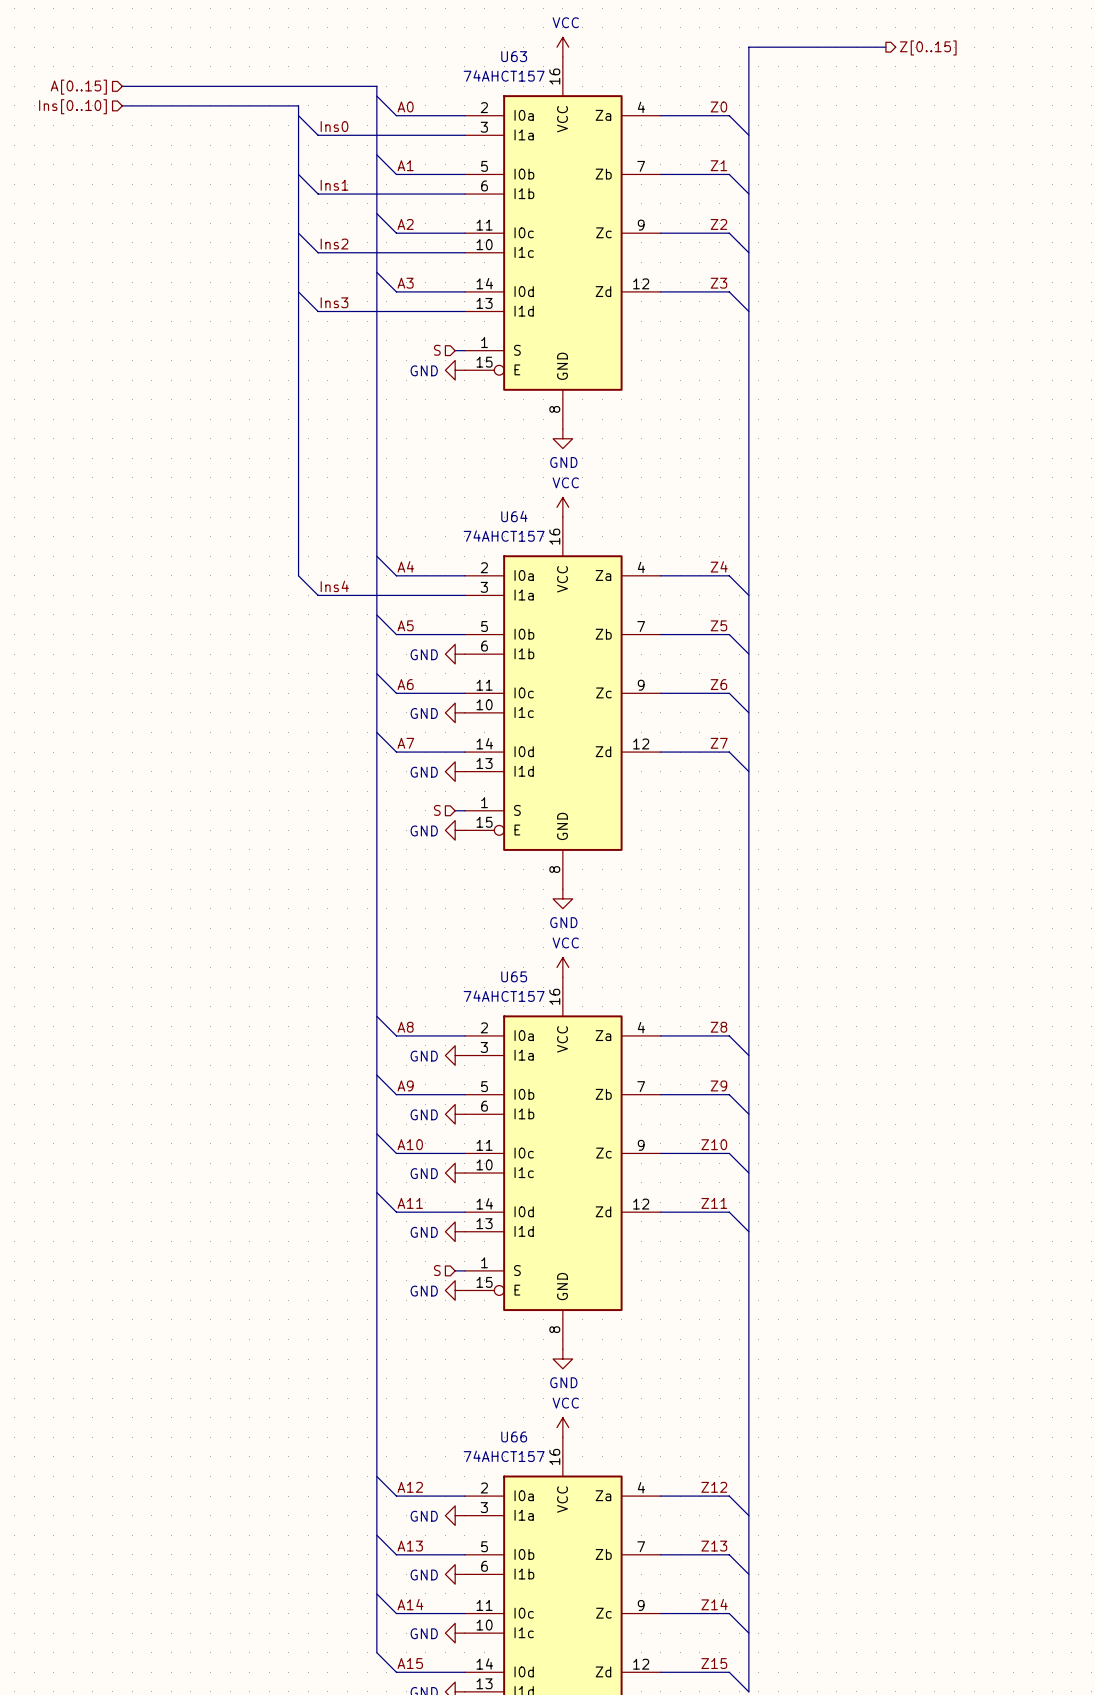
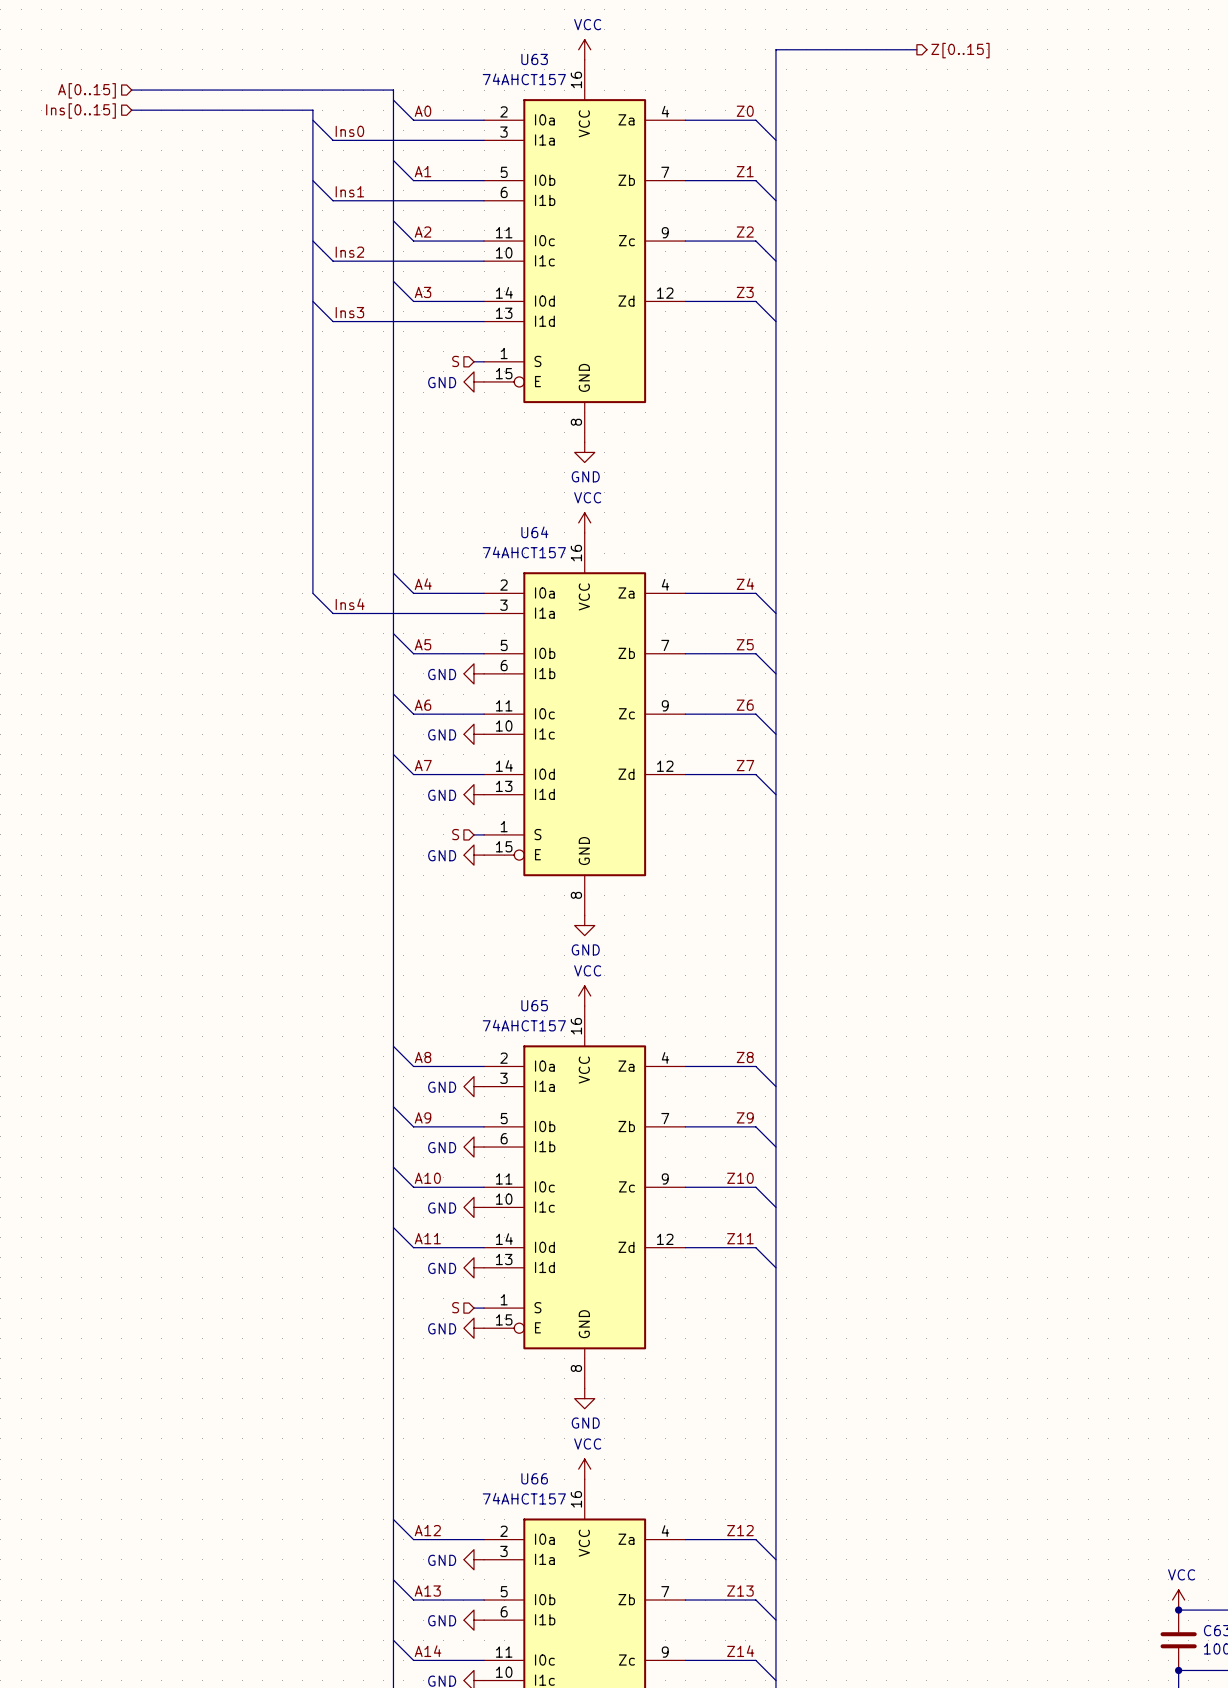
hierarchical label: Ins[0..10] (72, 106) -> Ins[0..15] (81, 110)

